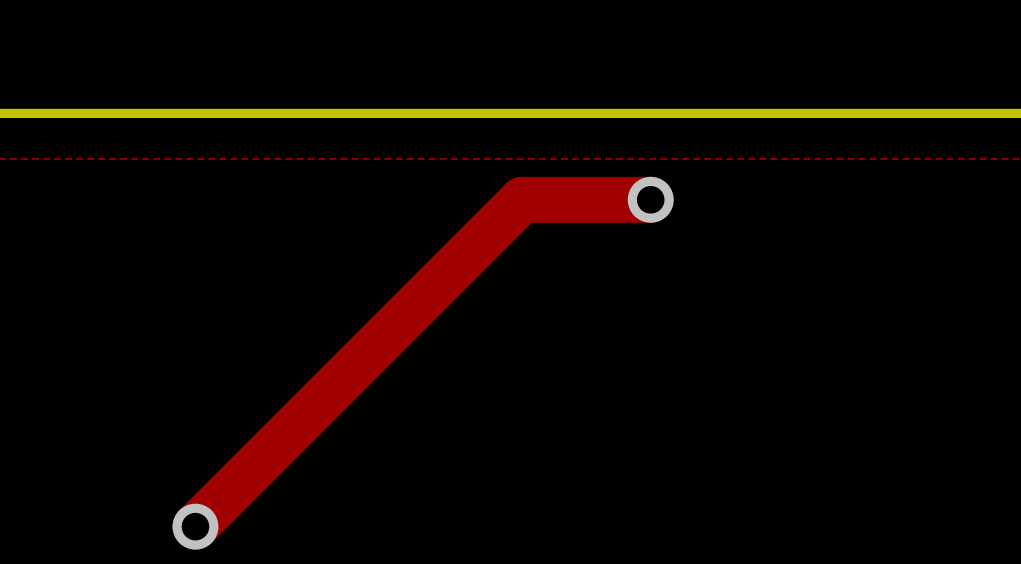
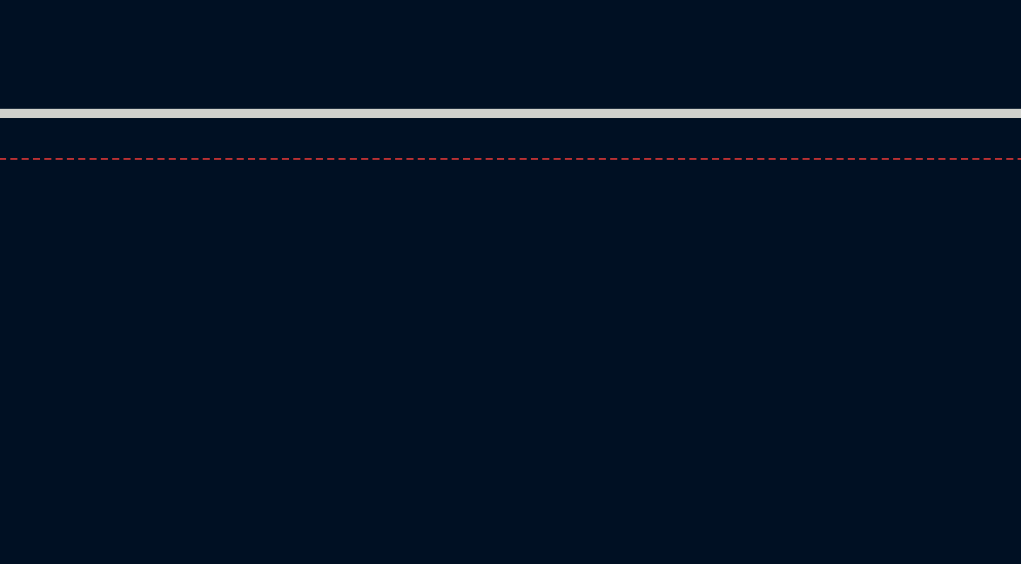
track: (650, 199) (522, 199) (195, 526) -> none
via: (650, 199) -> none
via: (195, 526) -> none

